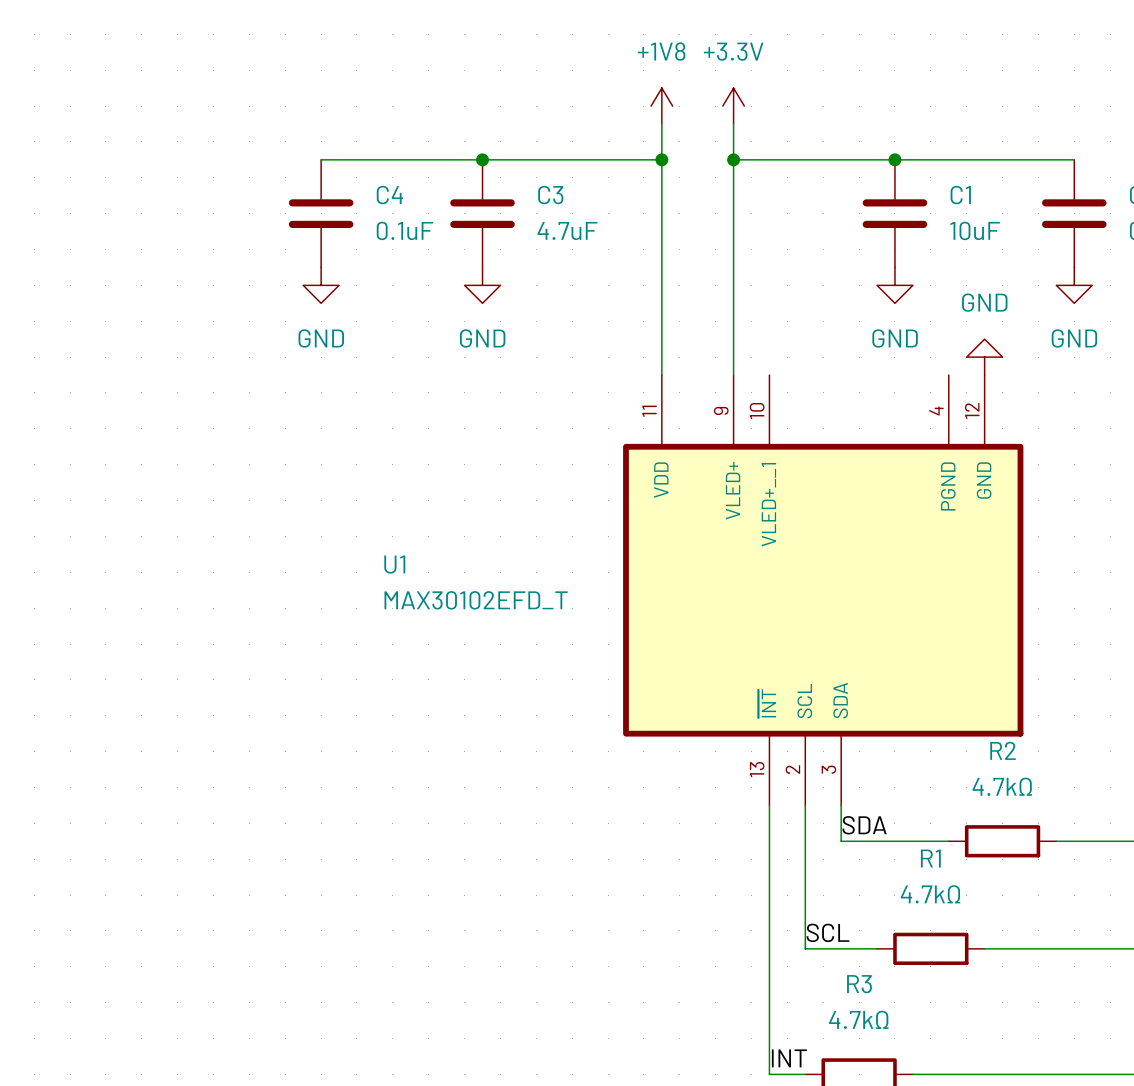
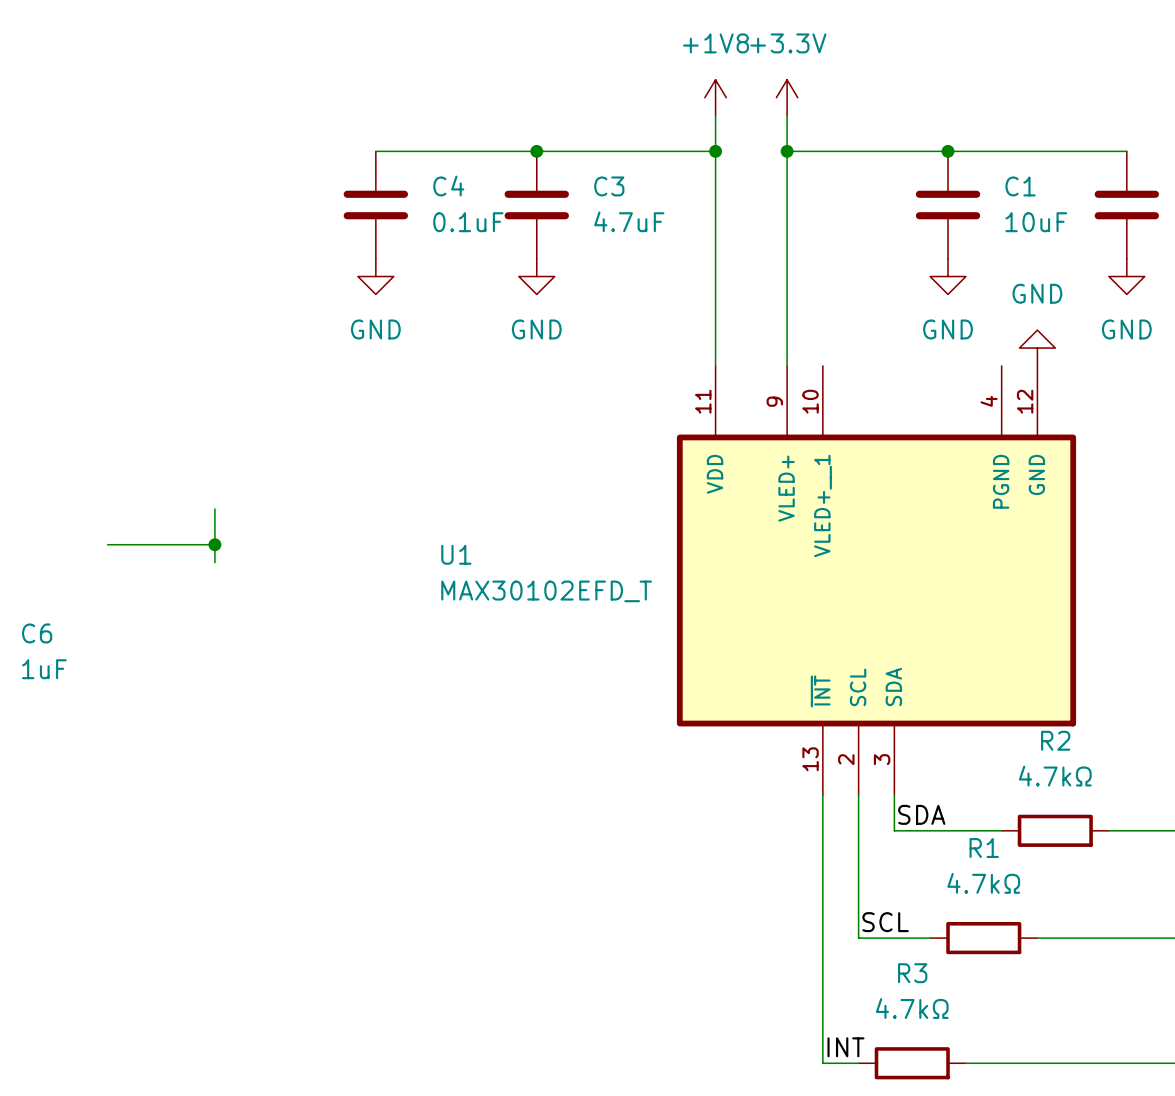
wire: none -> (214, 508) (214, 562)
wire: none -> (107, 544) (214, 544)
junction: none -> (214, 544)

